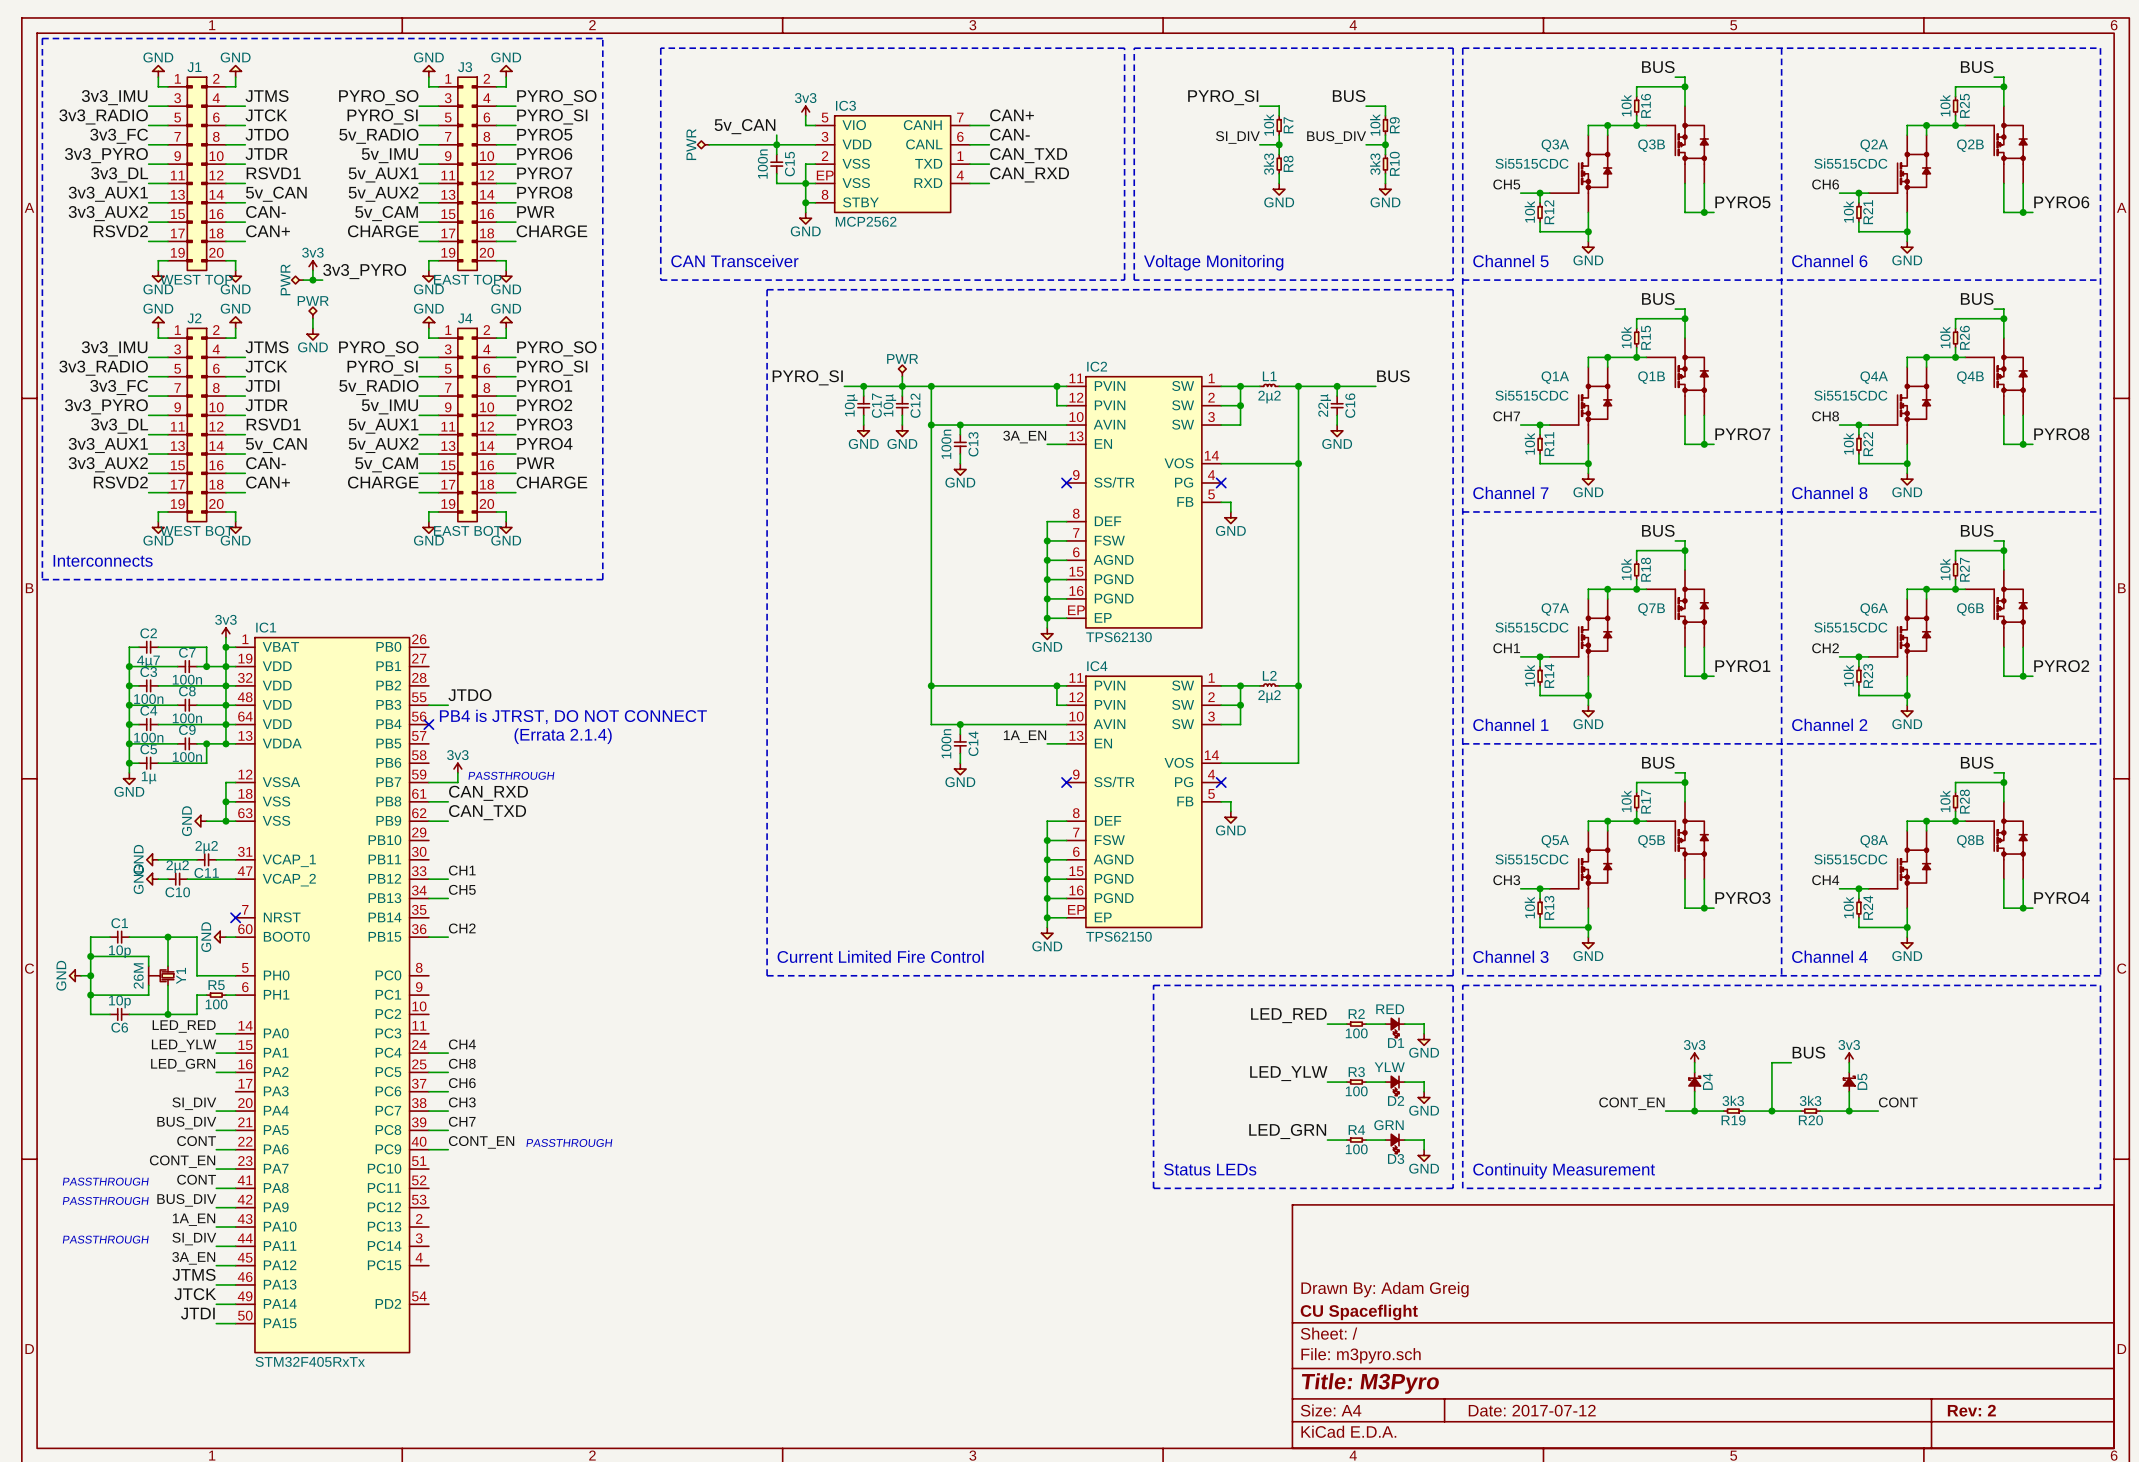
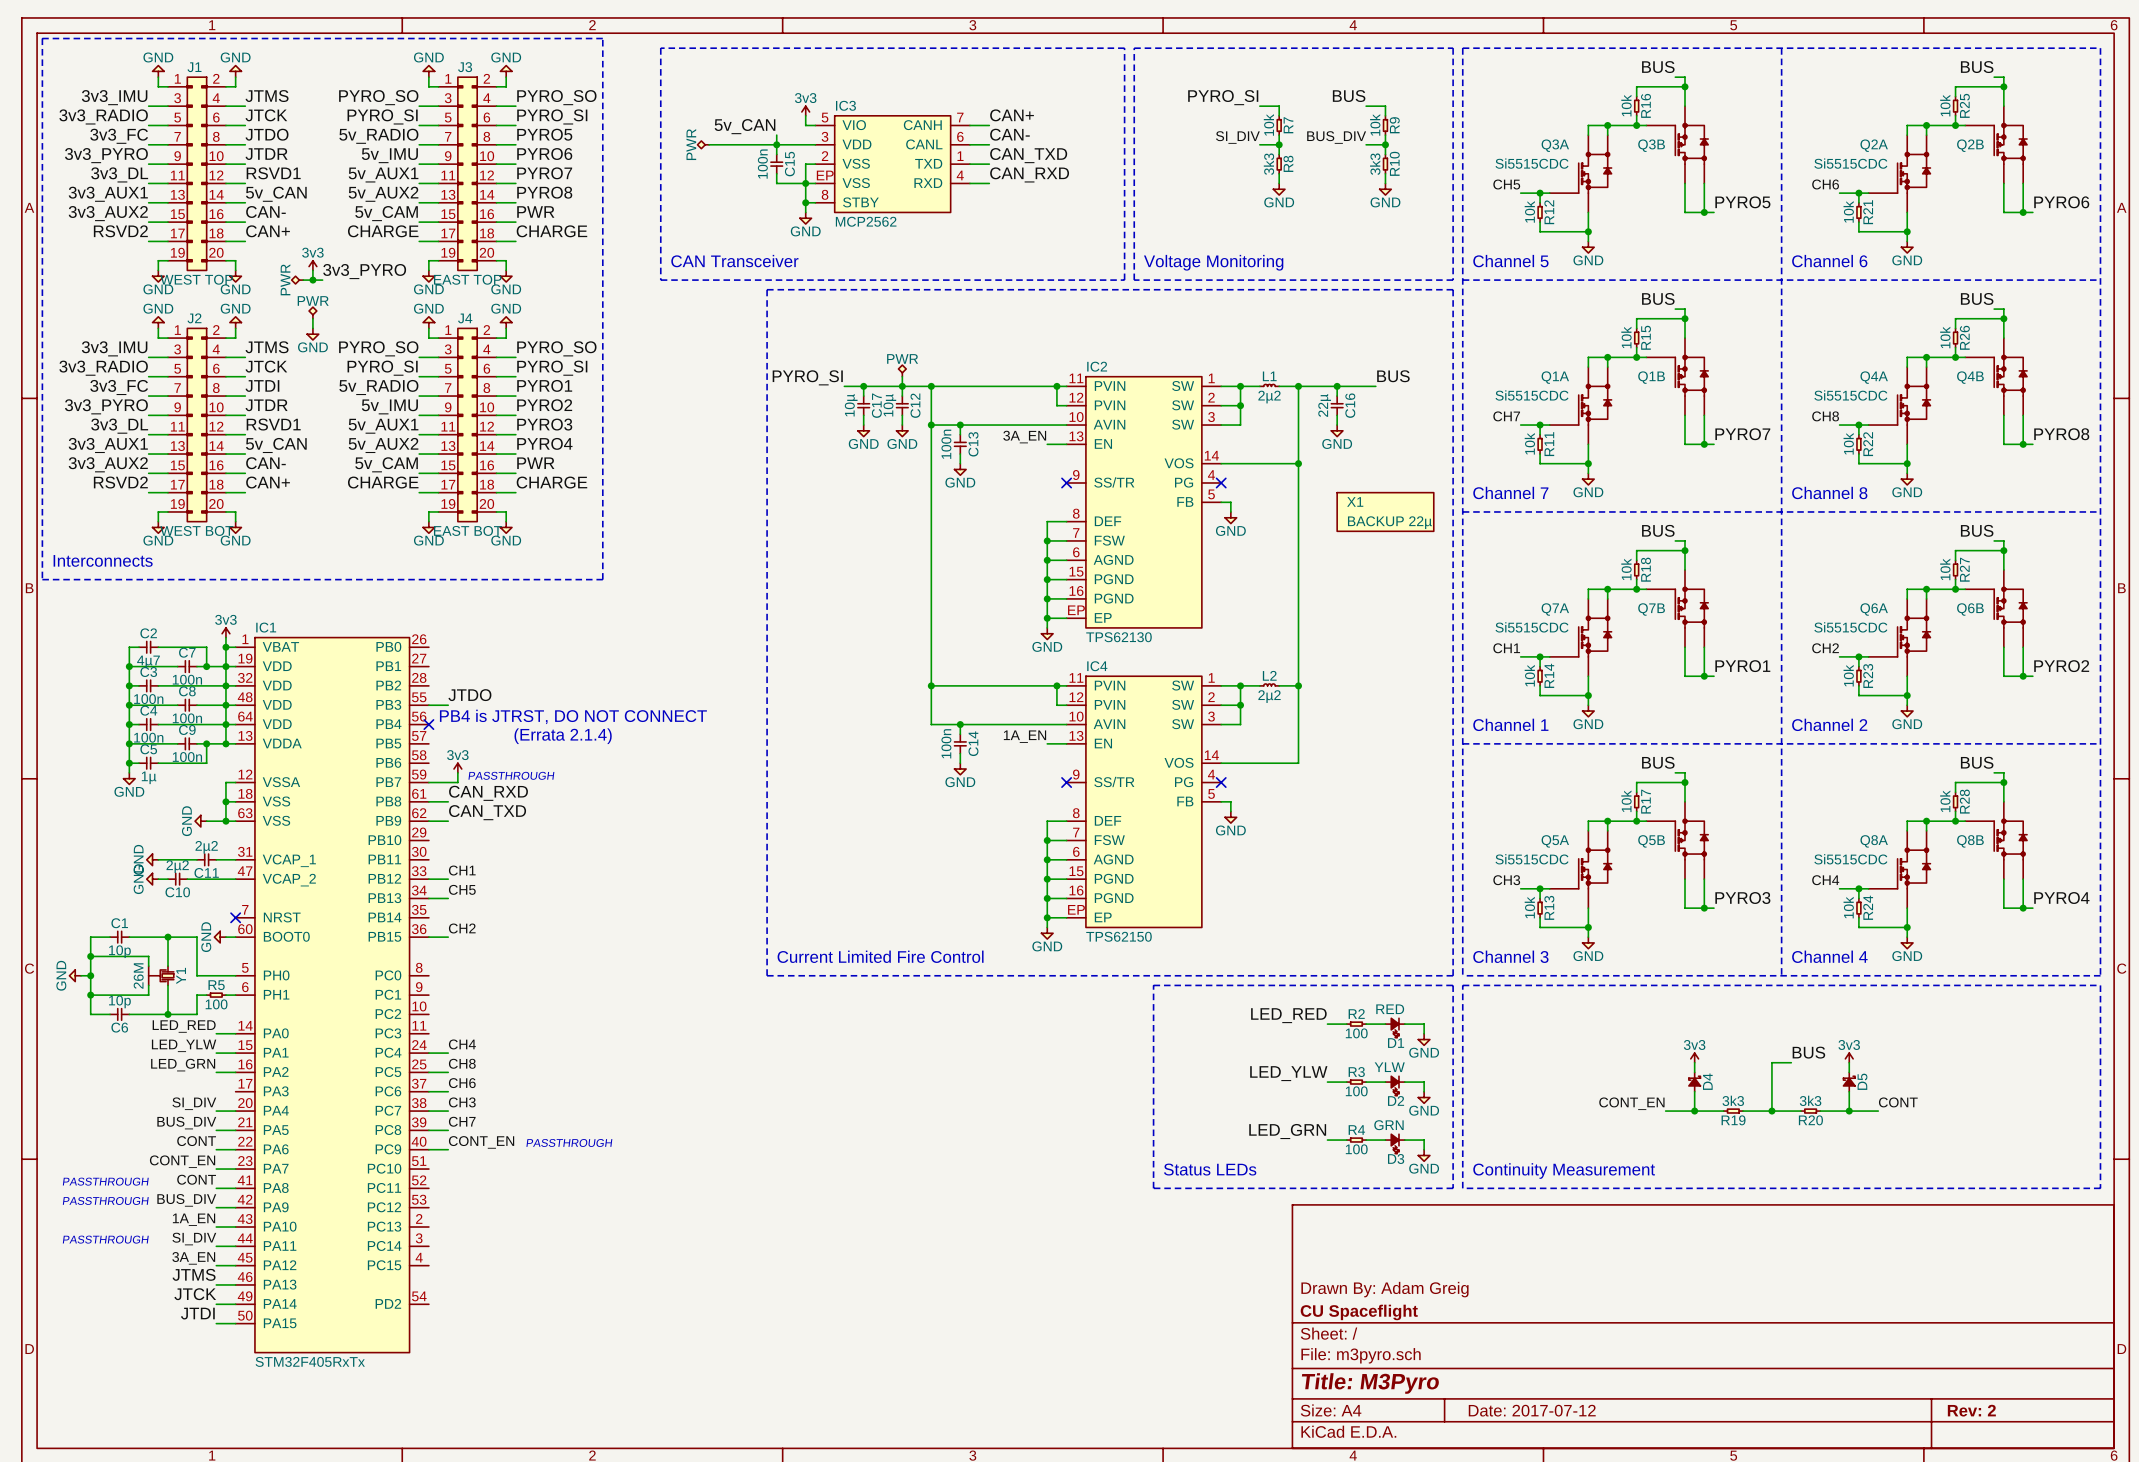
X1: none -> BACKUP 22µ (1385, 511)

